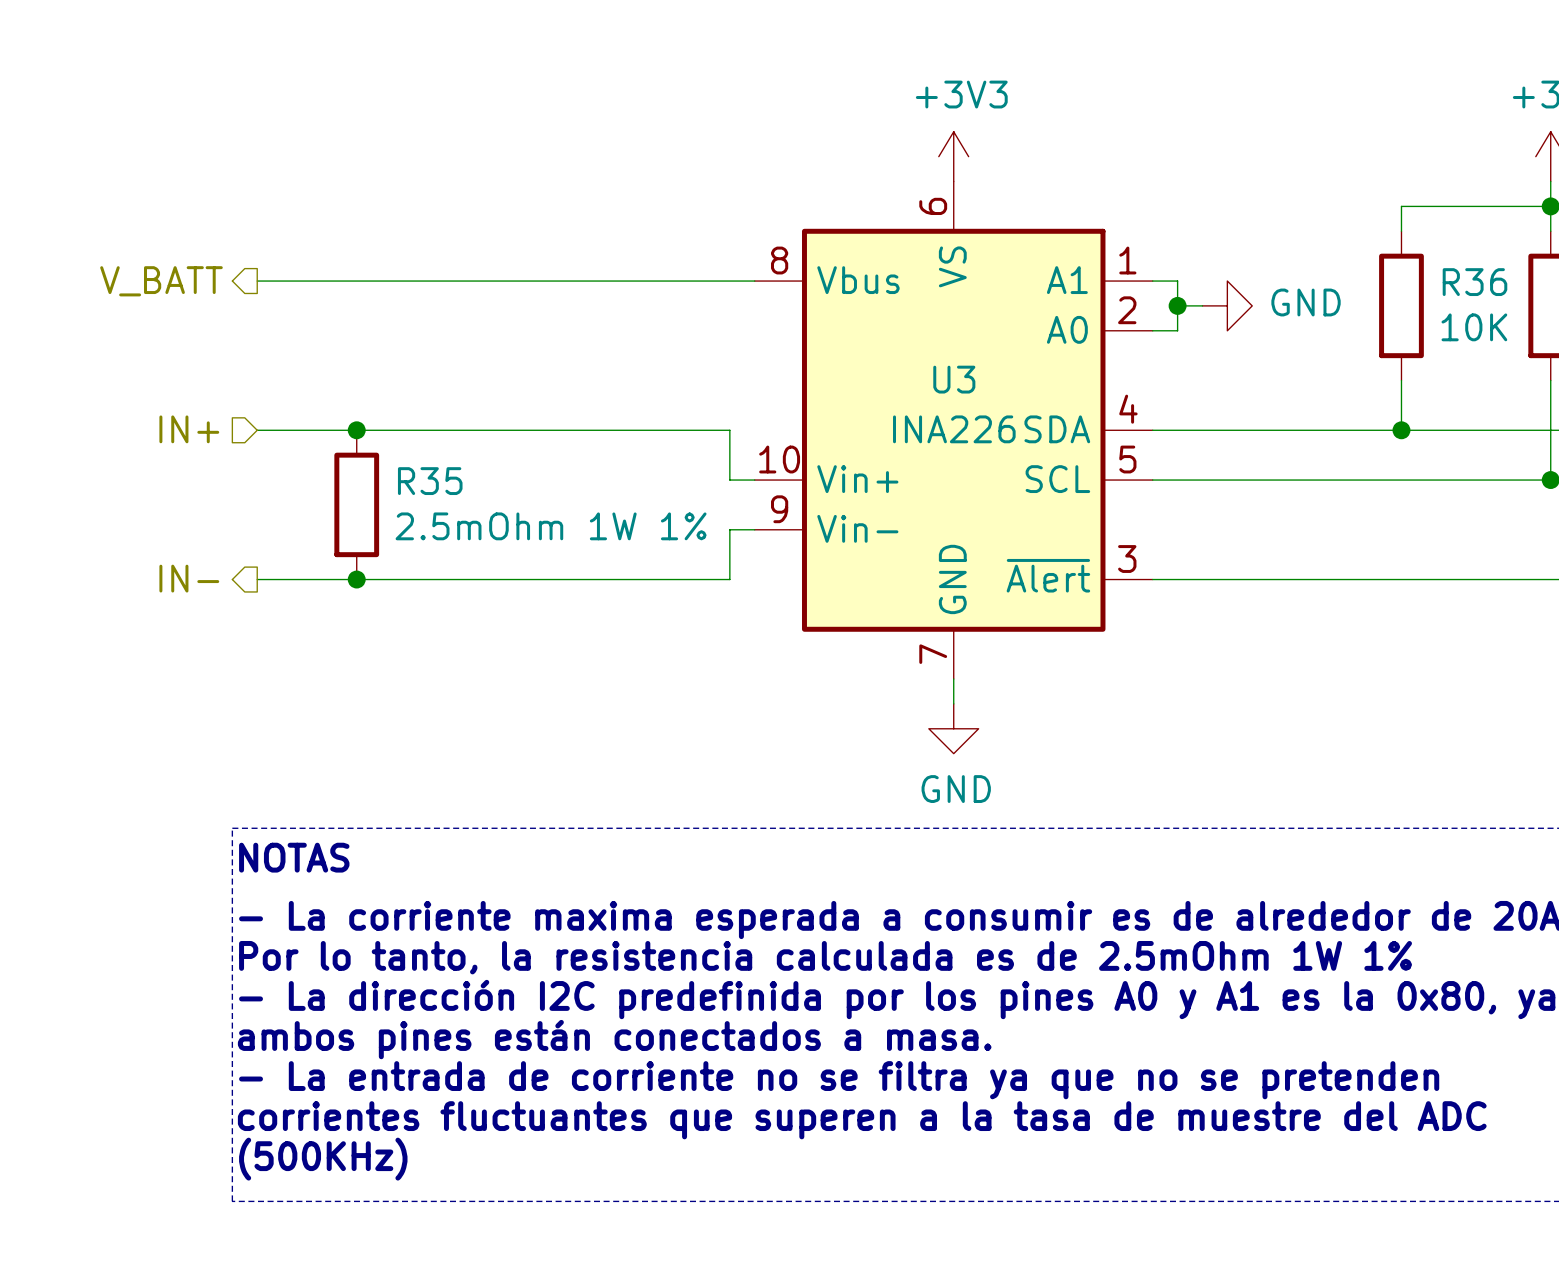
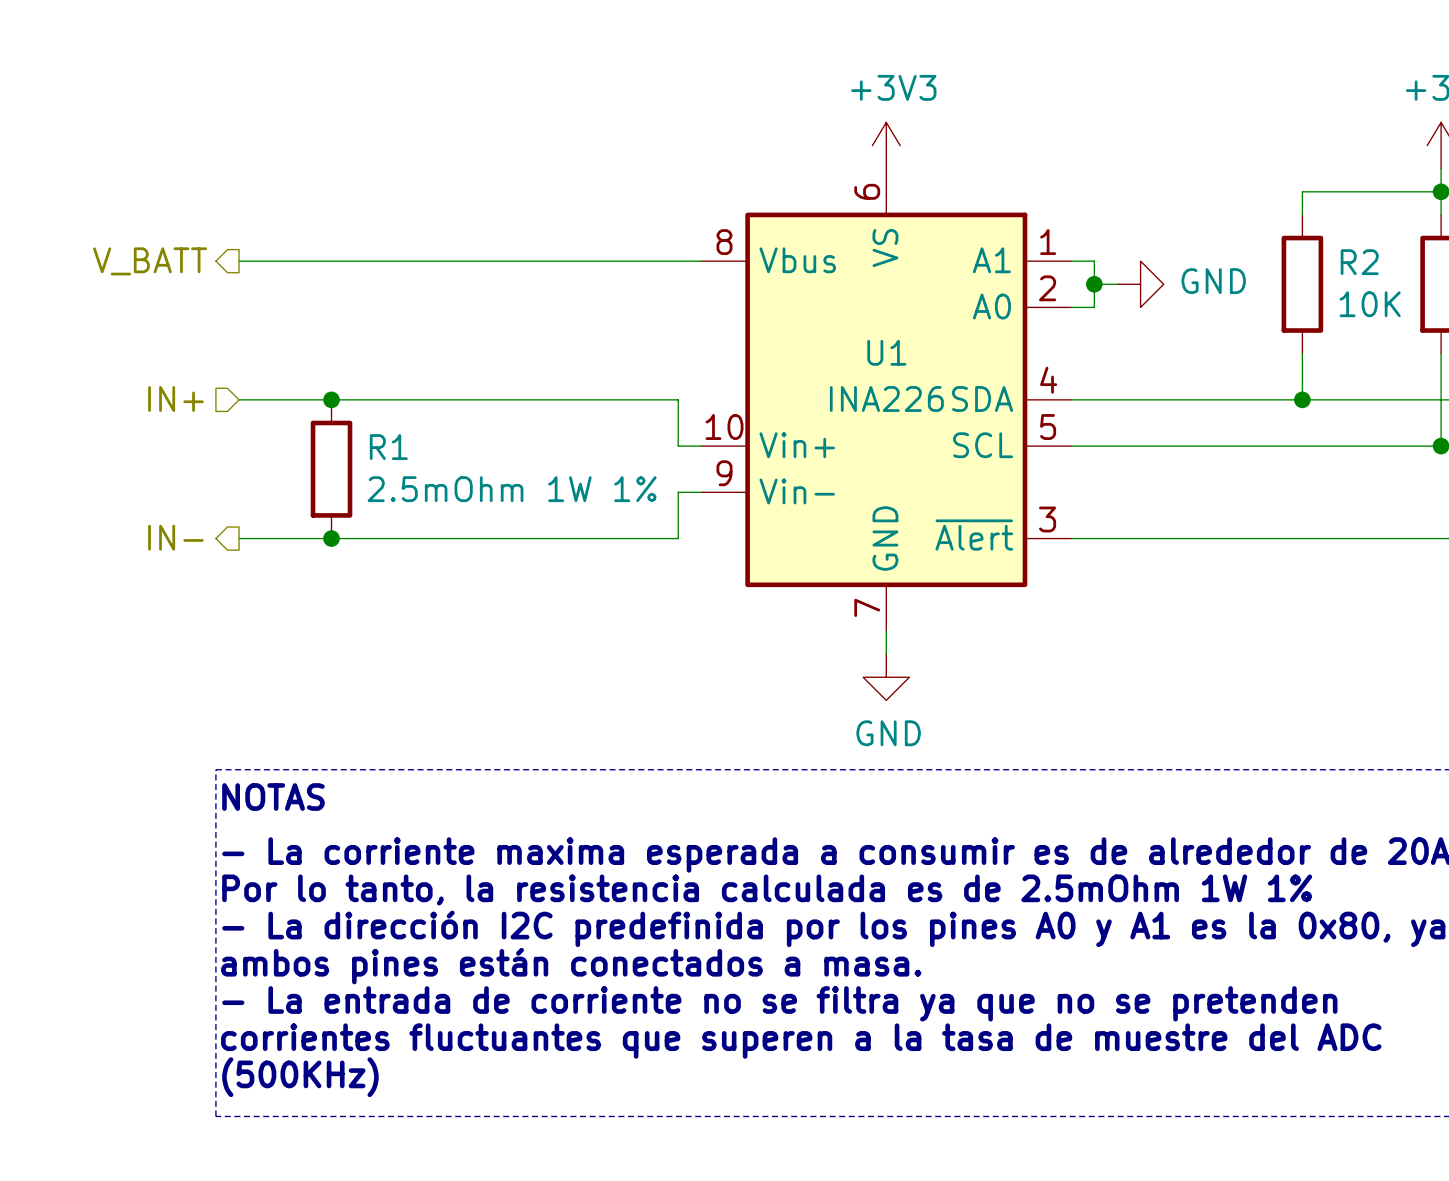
R36 name: R36 (1474, 282) -> R2 (1359, 262)
U3 name: U3 (954, 379) -> U1 (886, 352)
R35 name: R35 (430, 481) -> R1 (388, 447)

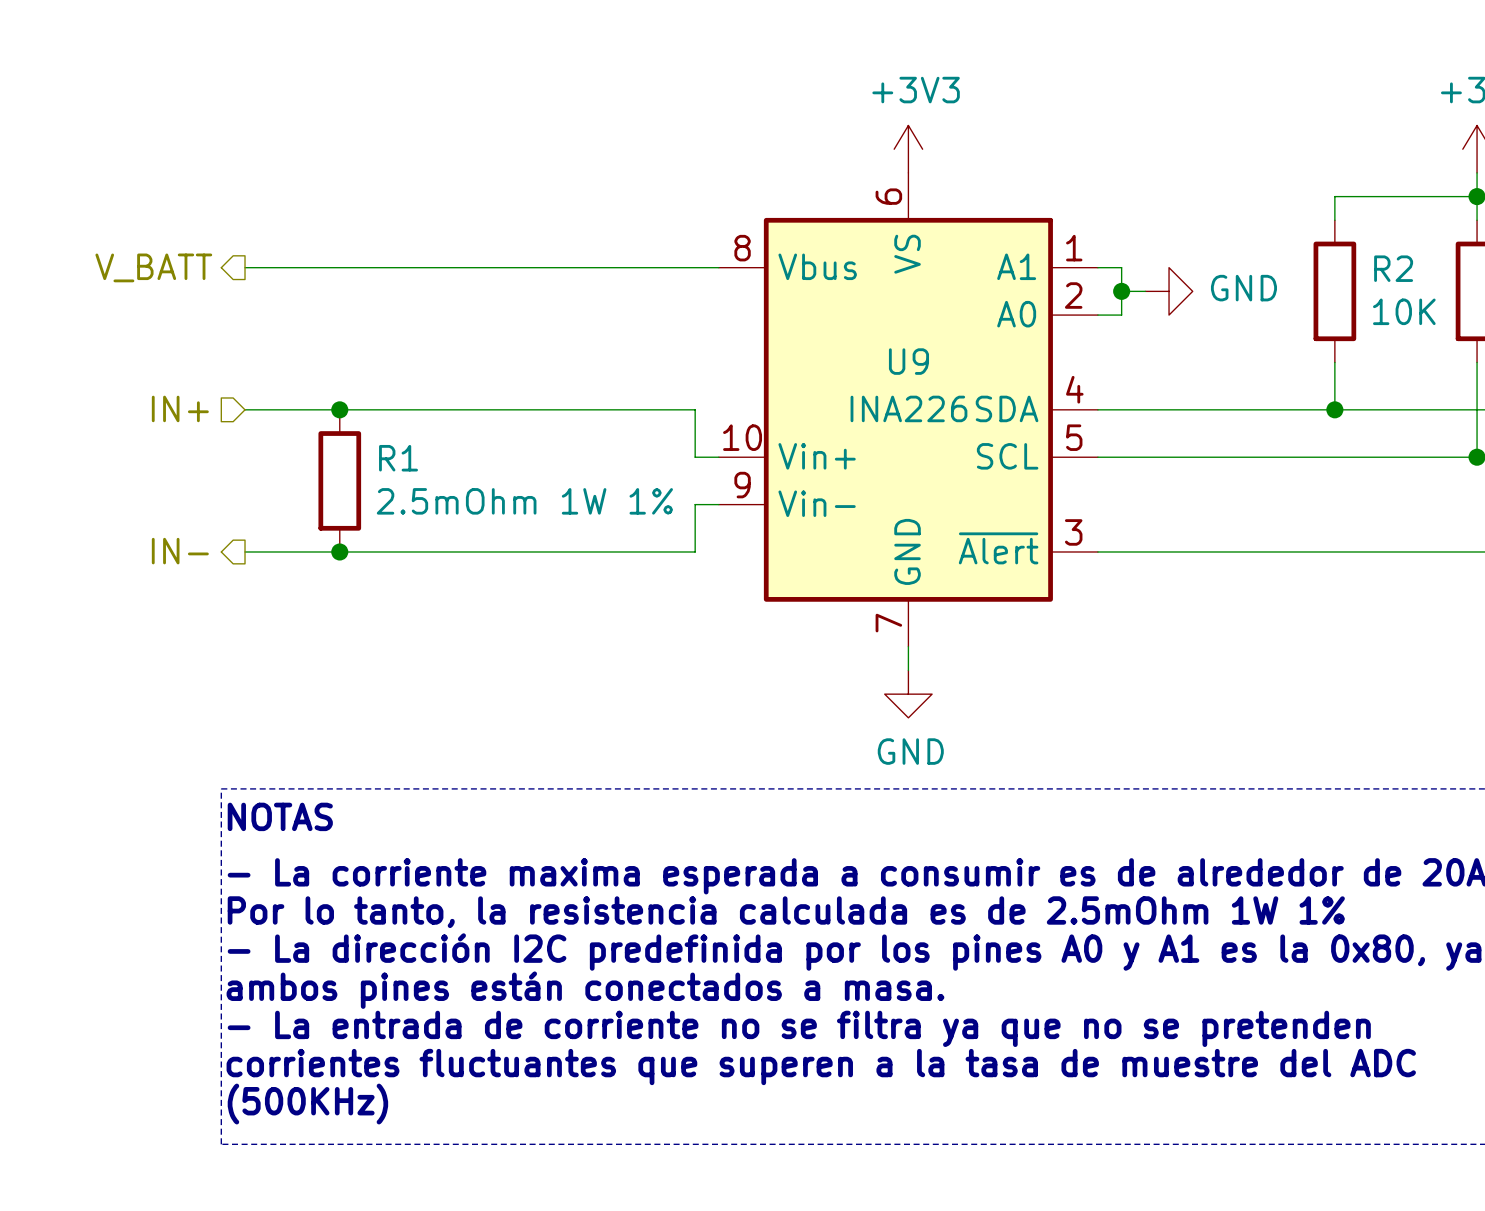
U1 name: U1 (886, 352) -> U9 (908, 361)

